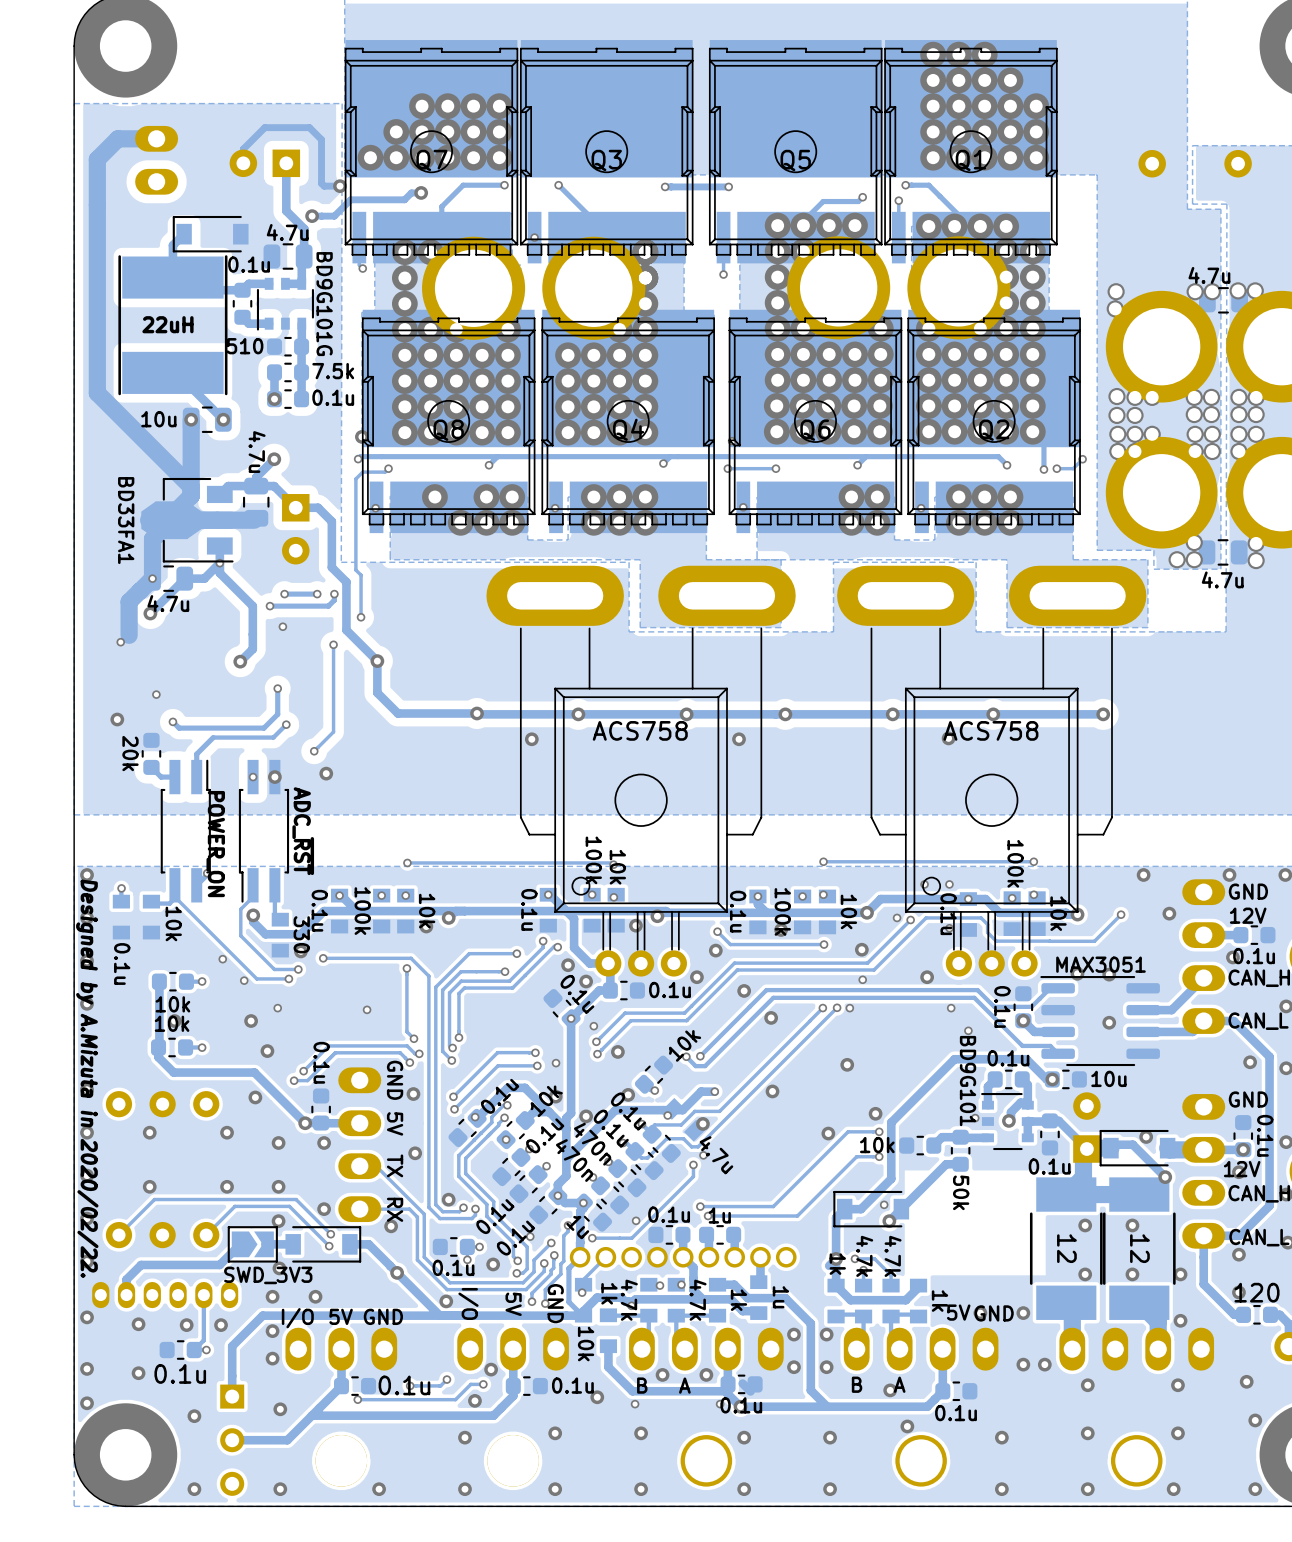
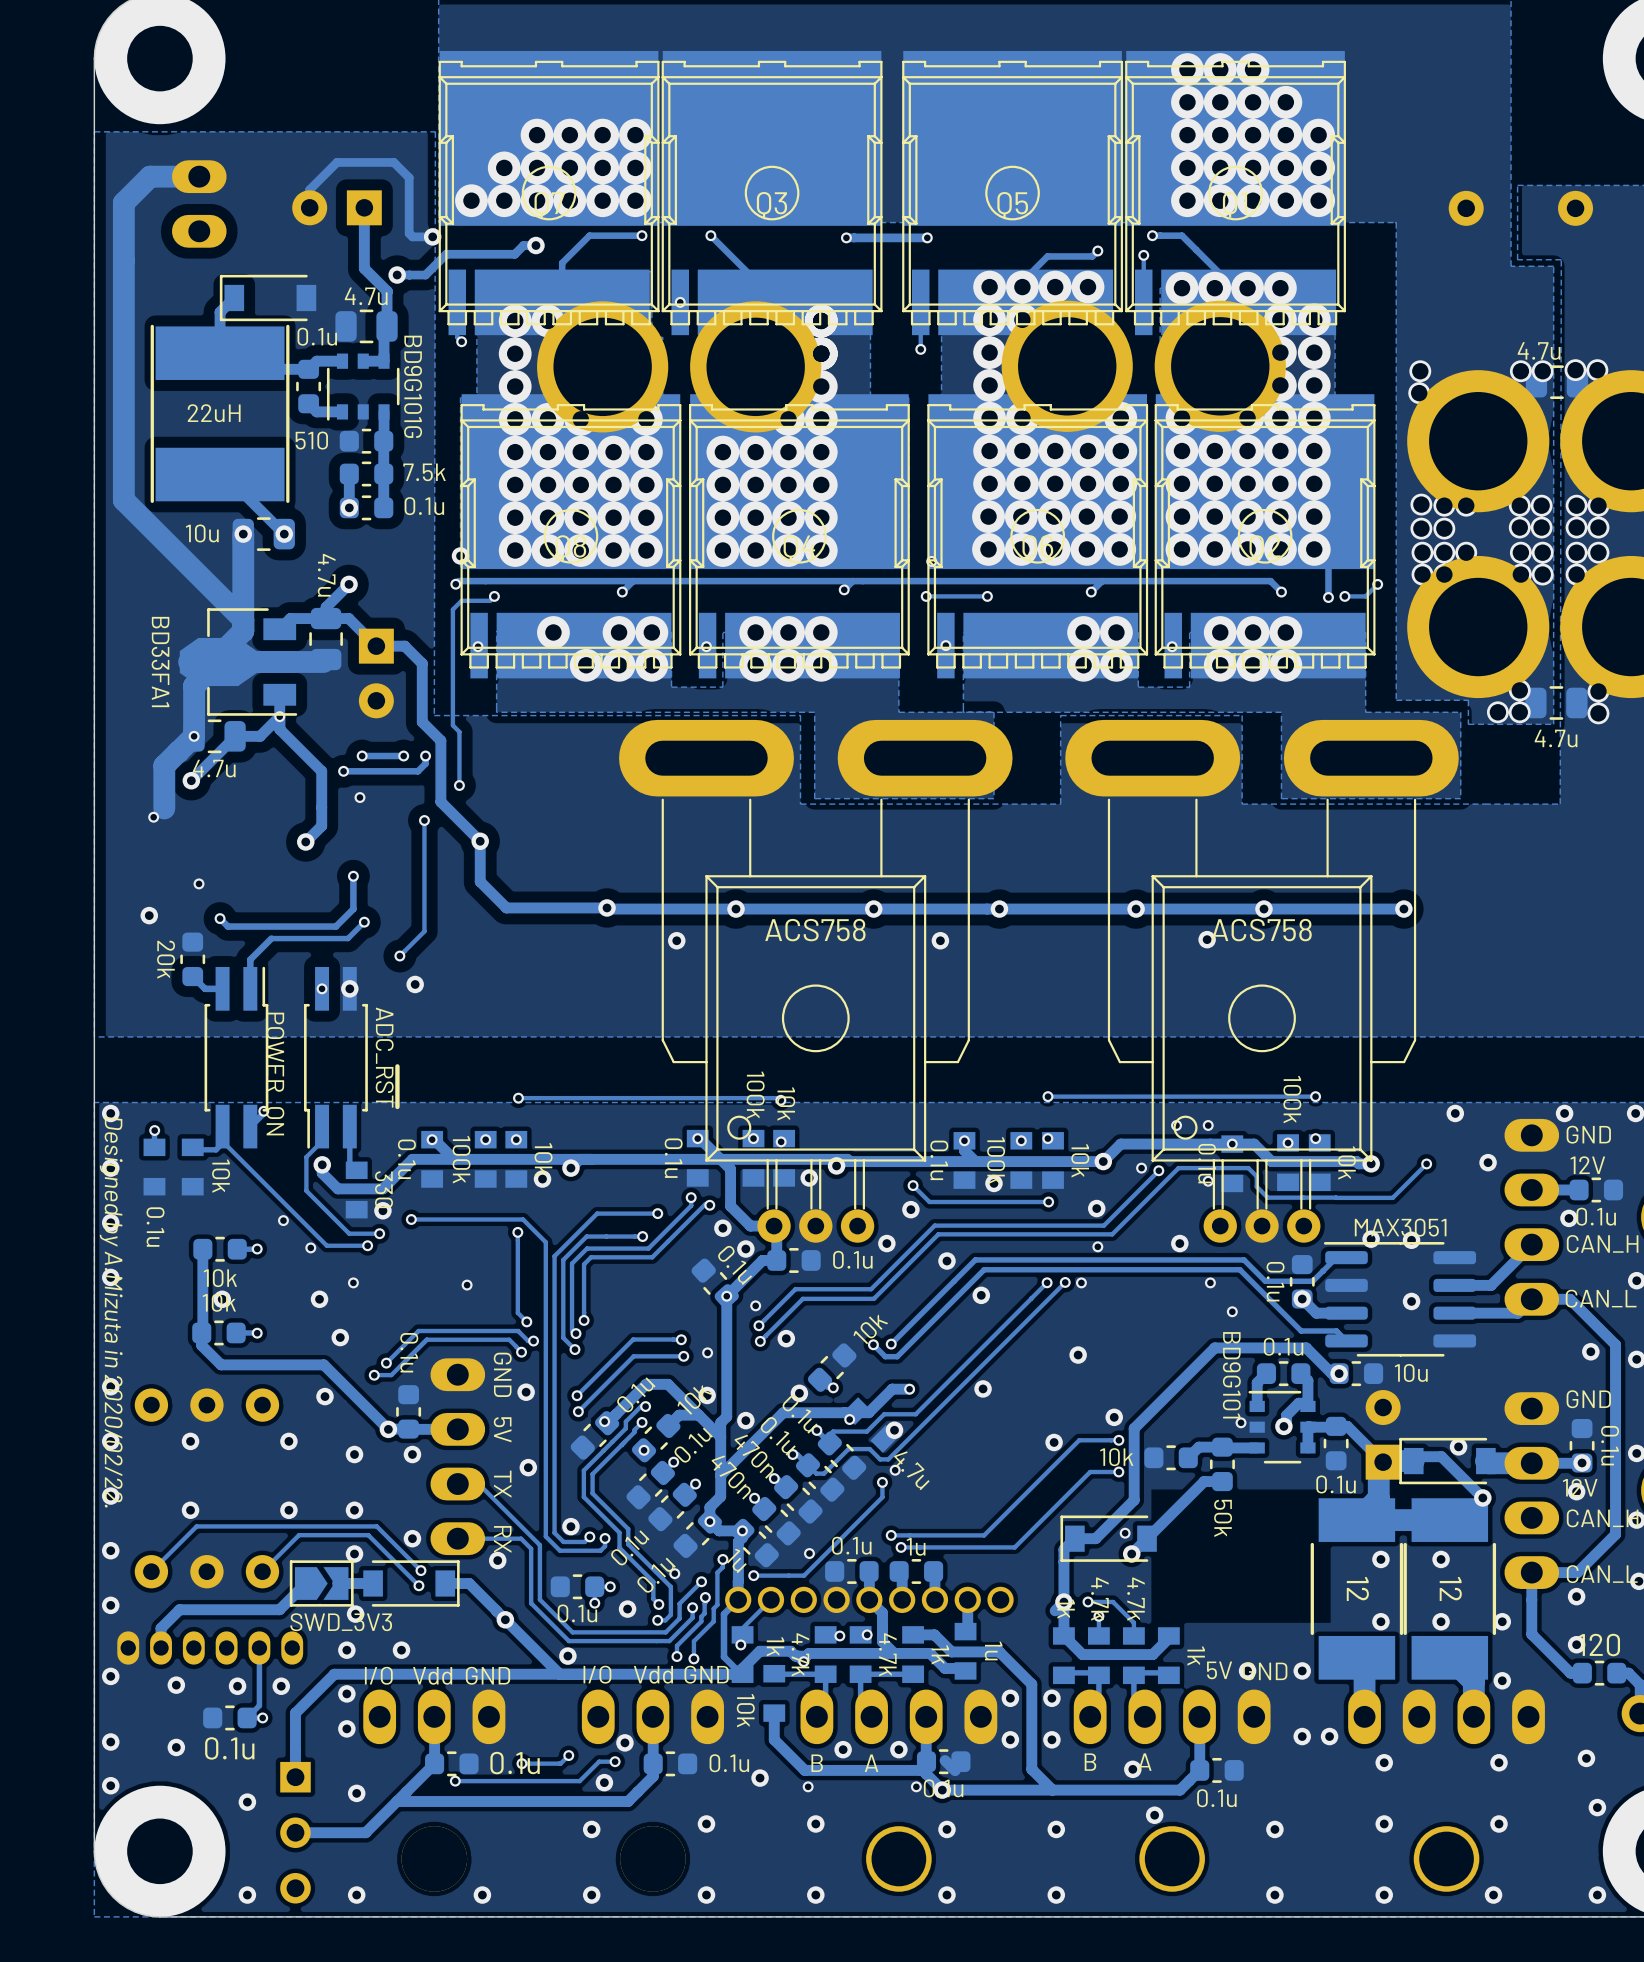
text rotation: 0° (468, 1303) -> 90° counterclockwise (597, 1674)
text rotation: 0° (555, 1303) -> 90° counterclockwise (706, 1674)
text: 5V (513, 1304) -> Vdd (653, 1674)
text: 5V (341, 1316) -> Vdd (432, 1675)

